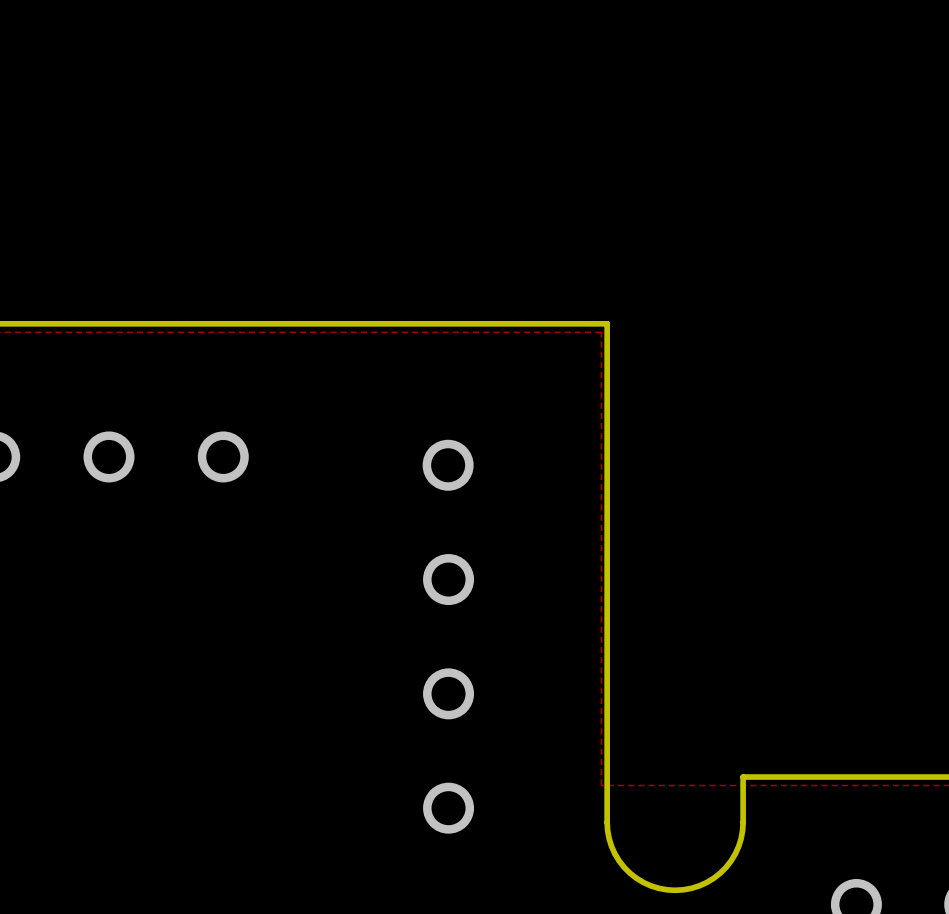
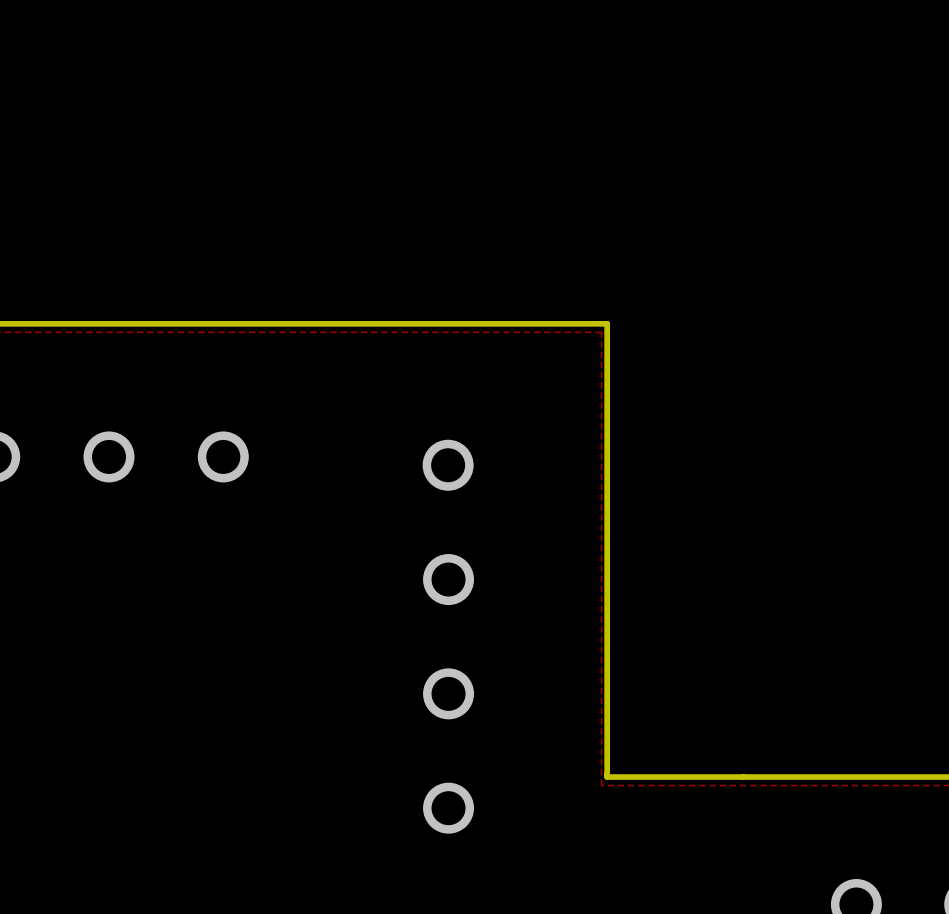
board edge: (607, 777) (607, 830) (614, 853) (624, 867) (636, 878) (658, 888) (675, 890) (691, 888) (713, 878) (726, 867) (735, 853) (742, 830) (743, 777) -> (607, 777) (743, 777)

